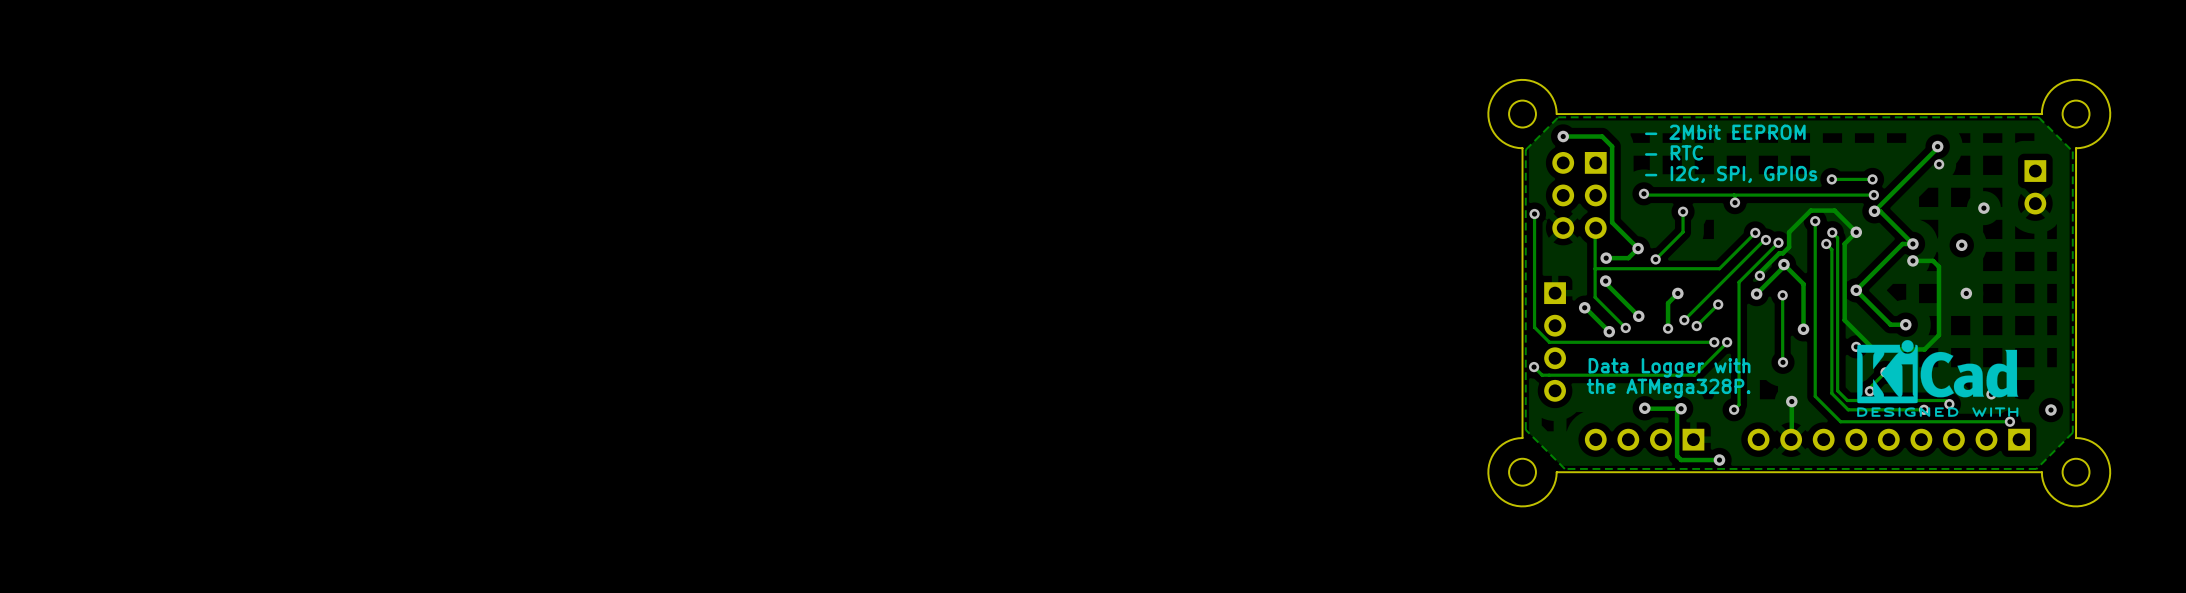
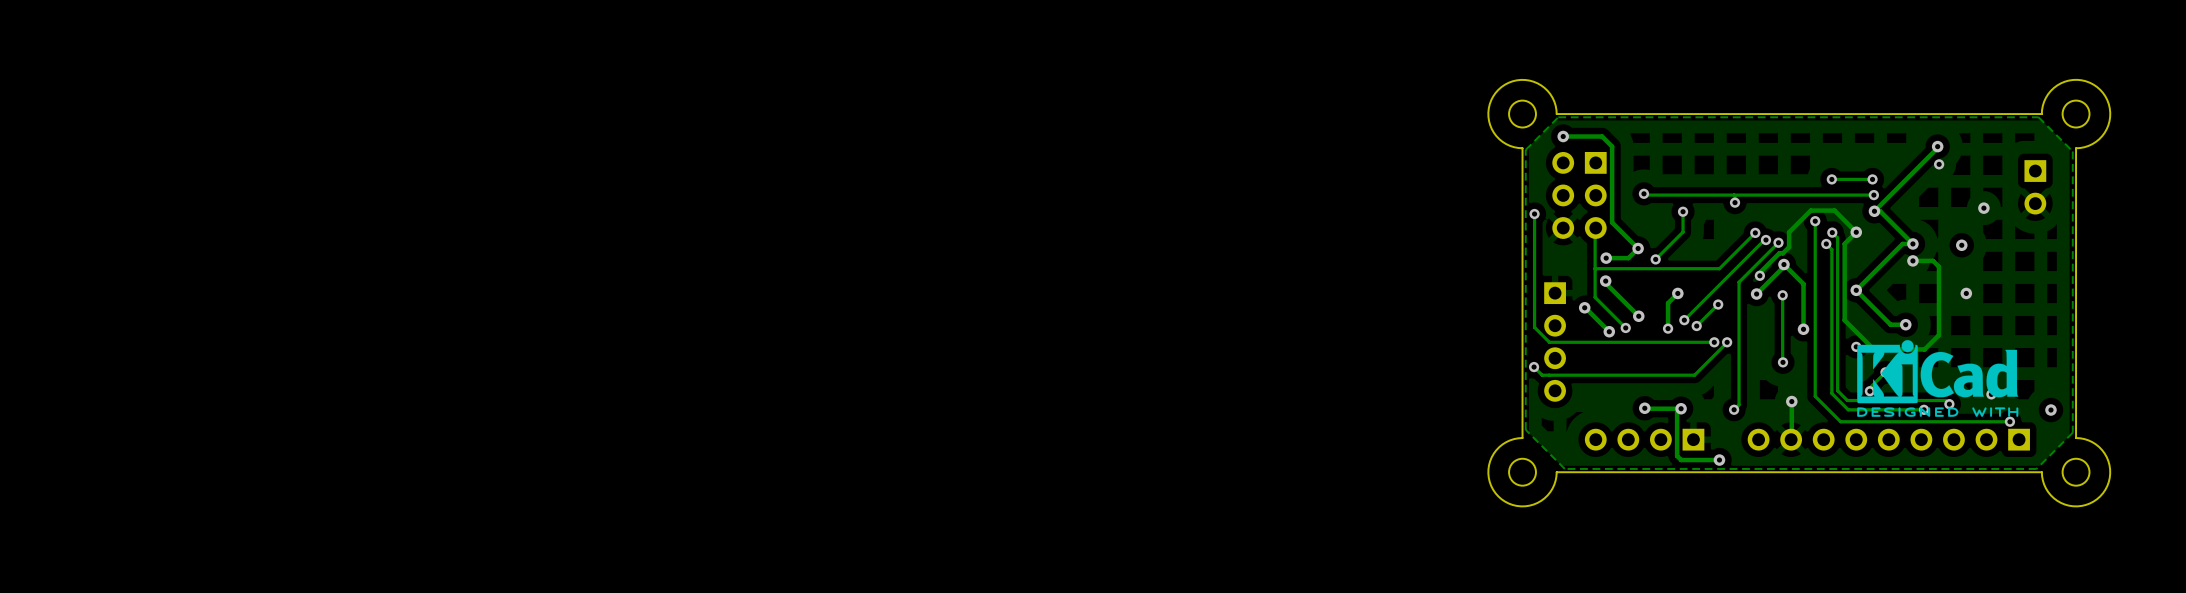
text: - 2Mbit EEPROM (1725, 132) -> none
text: - RTC (1674, 152) -> none
text: - I2C, SPI, GPIOs (1731, 174) -> none
text: Data Logger with (1669, 367) -> none
text: the ATMega328P. (1668, 388) -> none

